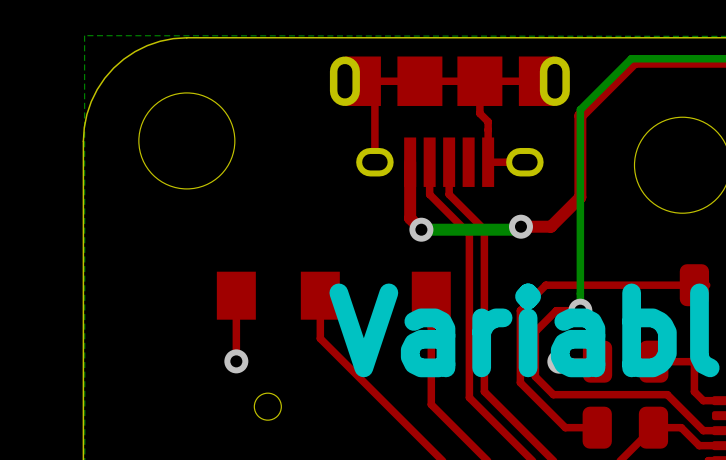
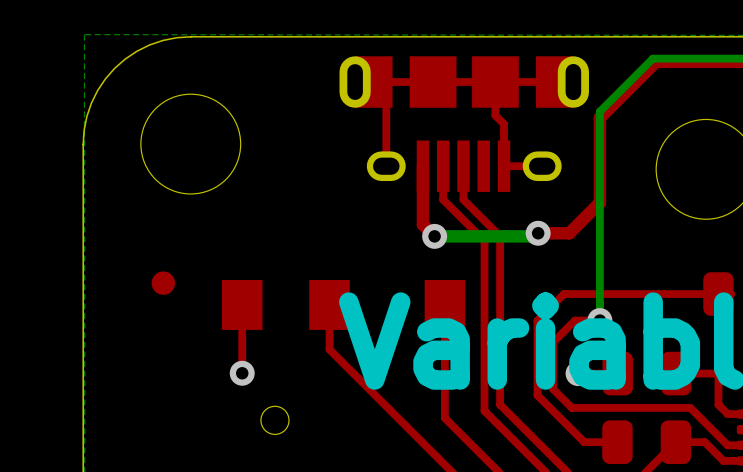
part: none -> (163, 283)

